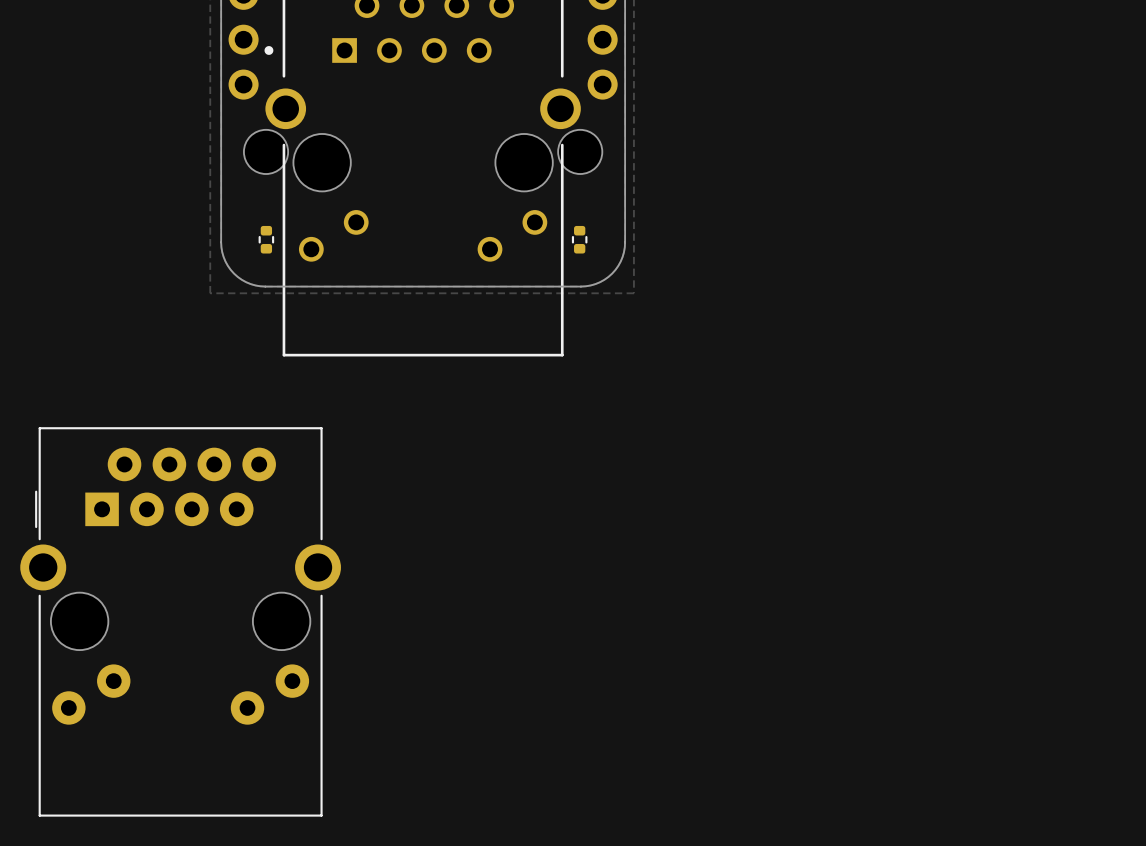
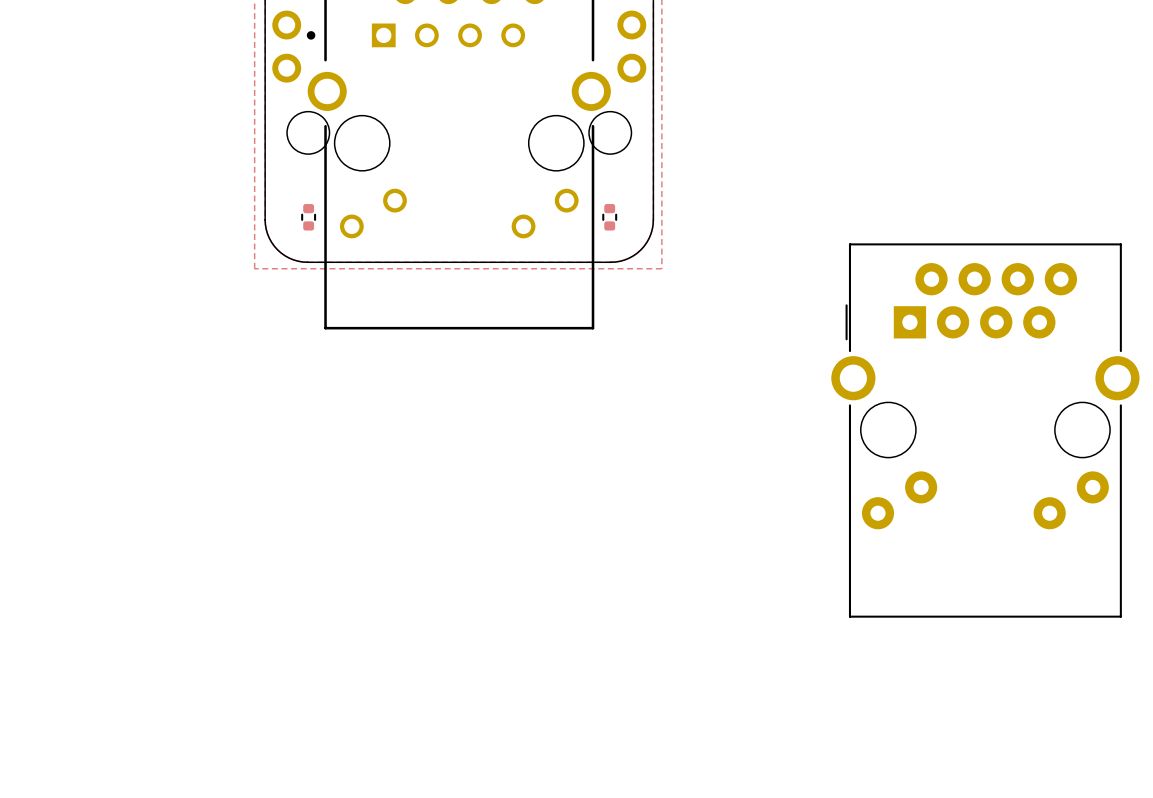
part: none -> (985, 430)
part: (180, 621) -> none

